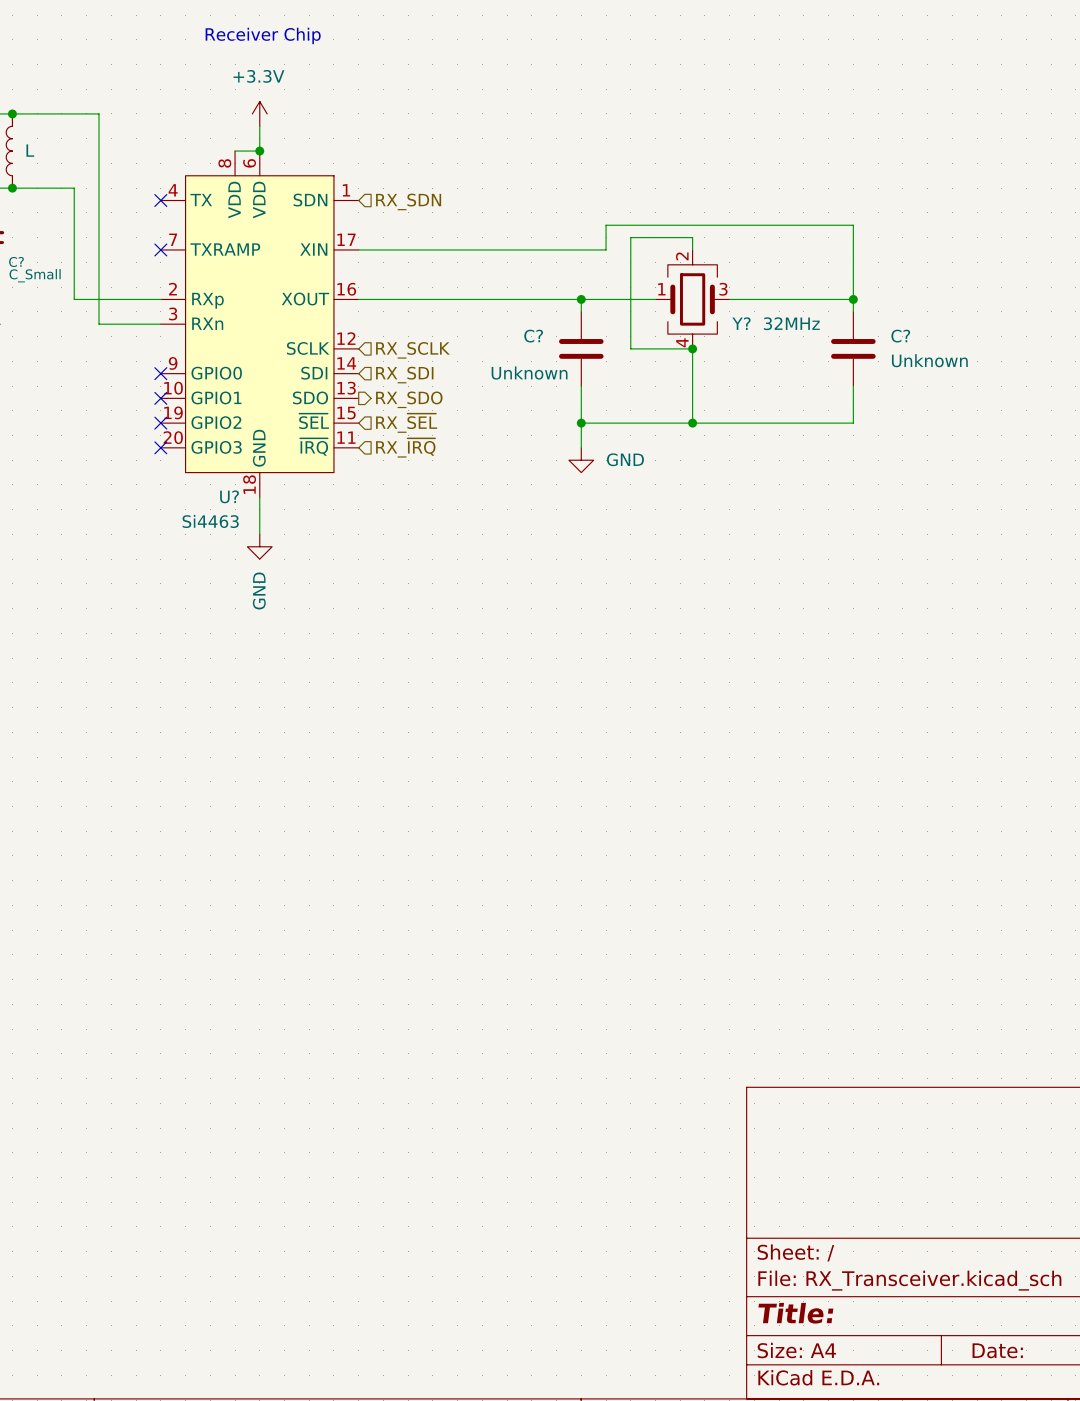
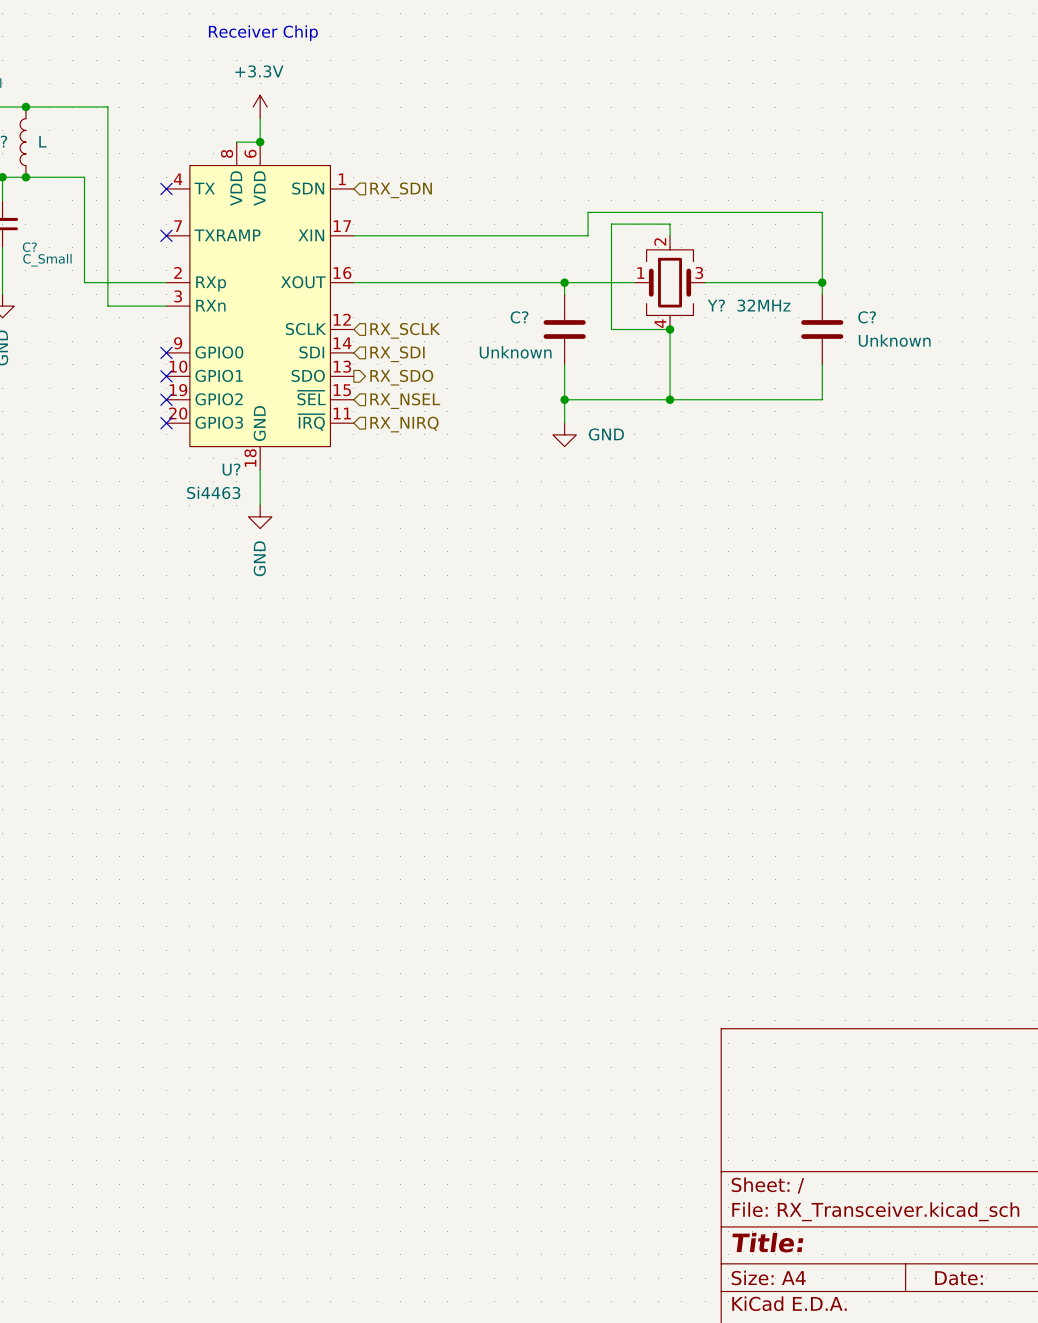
hierarchical label: RX_~{SEL} (406, 423) -> RX_NSEL (405, 401)
hierarchical label: RX_~{IRQ} (405, 447) -> RX_NIRQ (404, 424)

